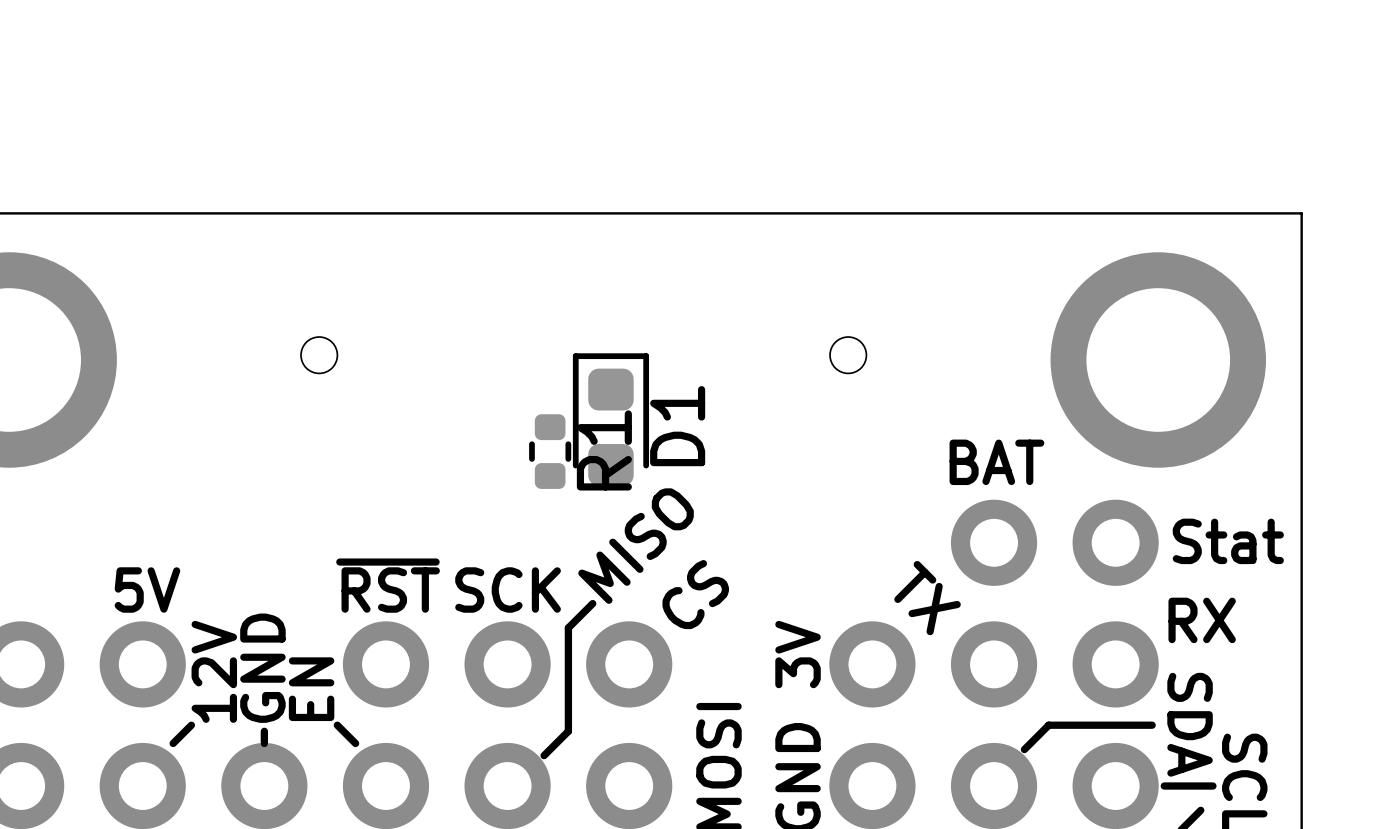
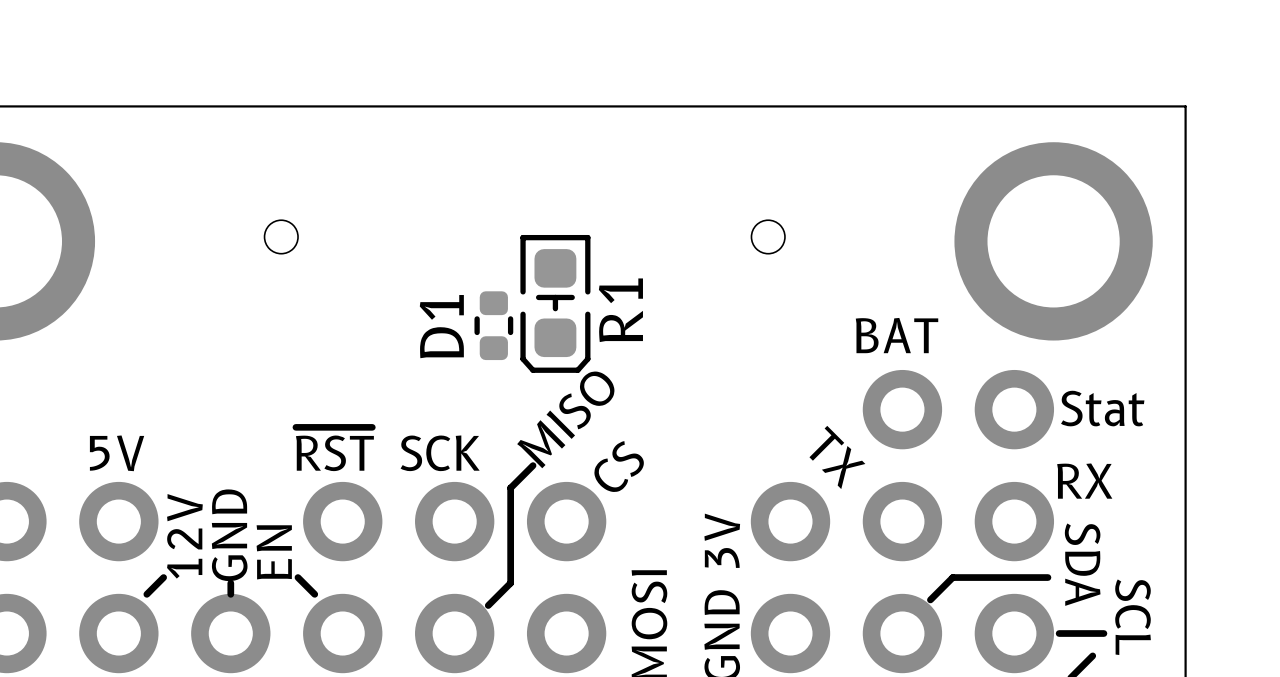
D1 footprint: [572, 353, 650, 486] -> [520, 234, 591, 373]
D1 name position: D1 (677, 426) -> D1 (441, 326)
R1 name position: R1 (604, 450) -> R1 (620, 310)

